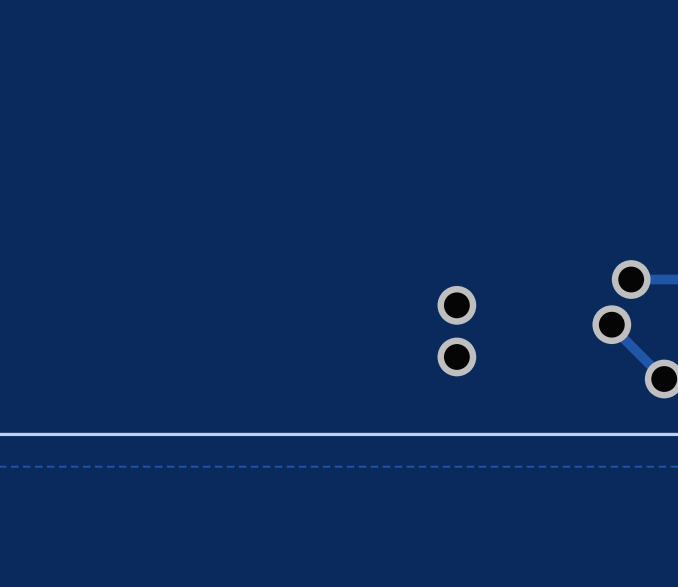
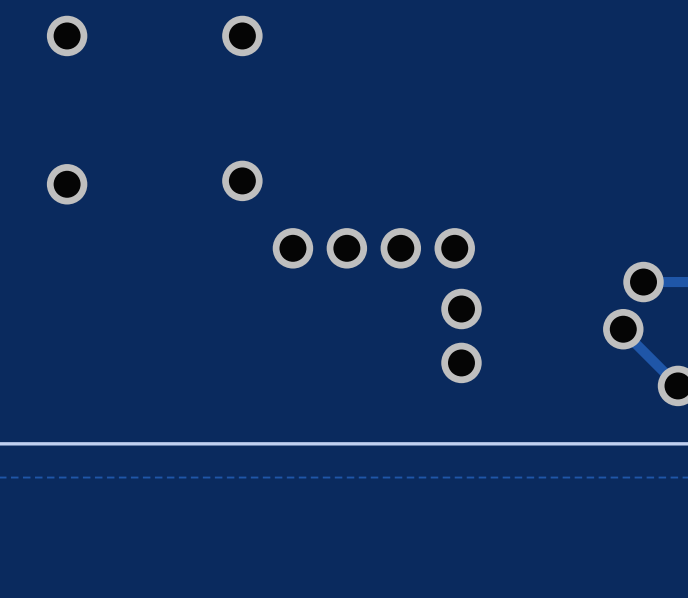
via: none -> (67, 35)
via: none -> (242, 35)
via: none -> (242, 180)
via: none -> (67, 184)
via: none -> (292, 248)
via: none -> (346, 248)
via: none -> (400, 248)
via: none -> (454, 248)

